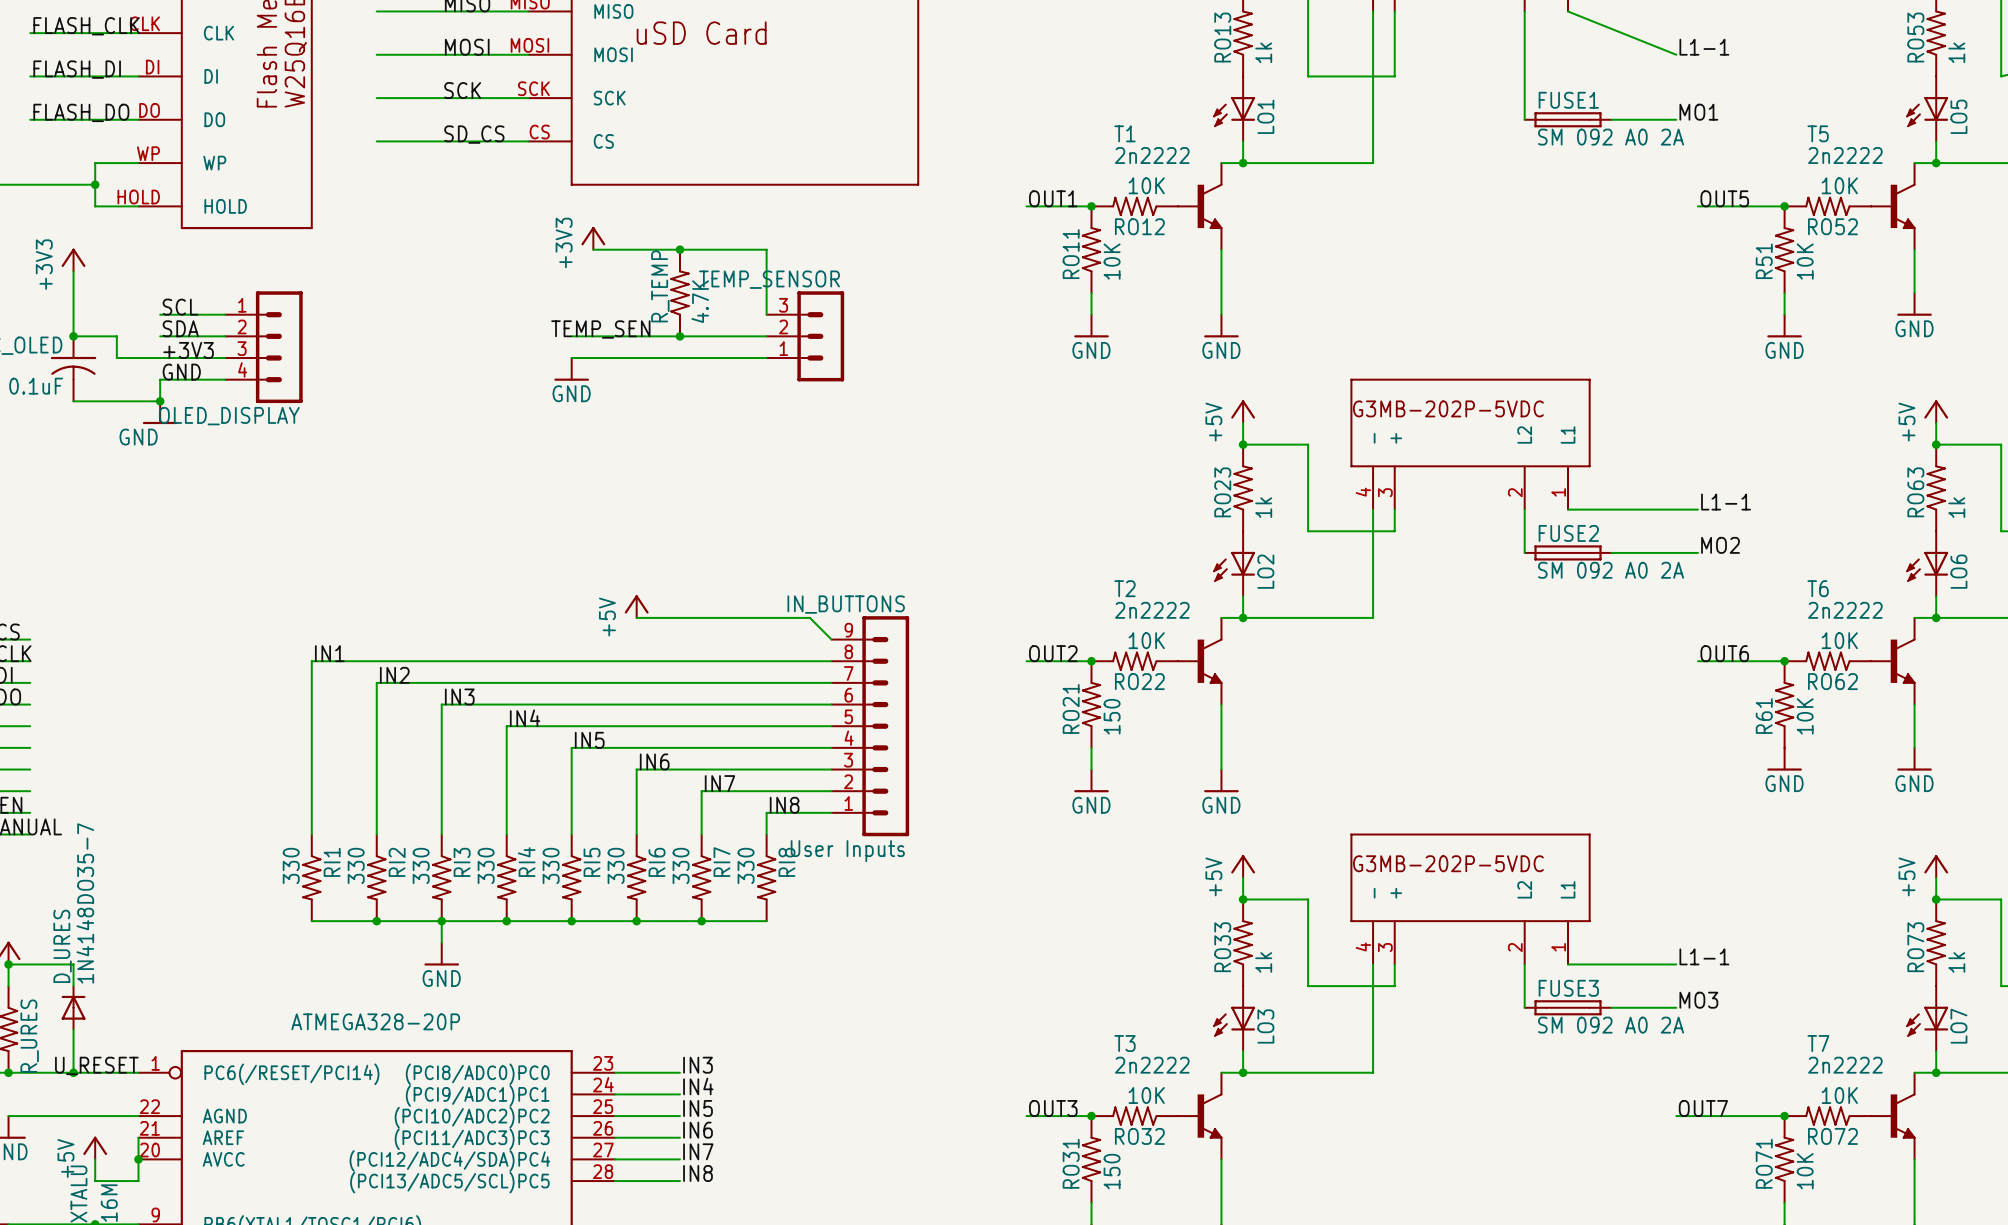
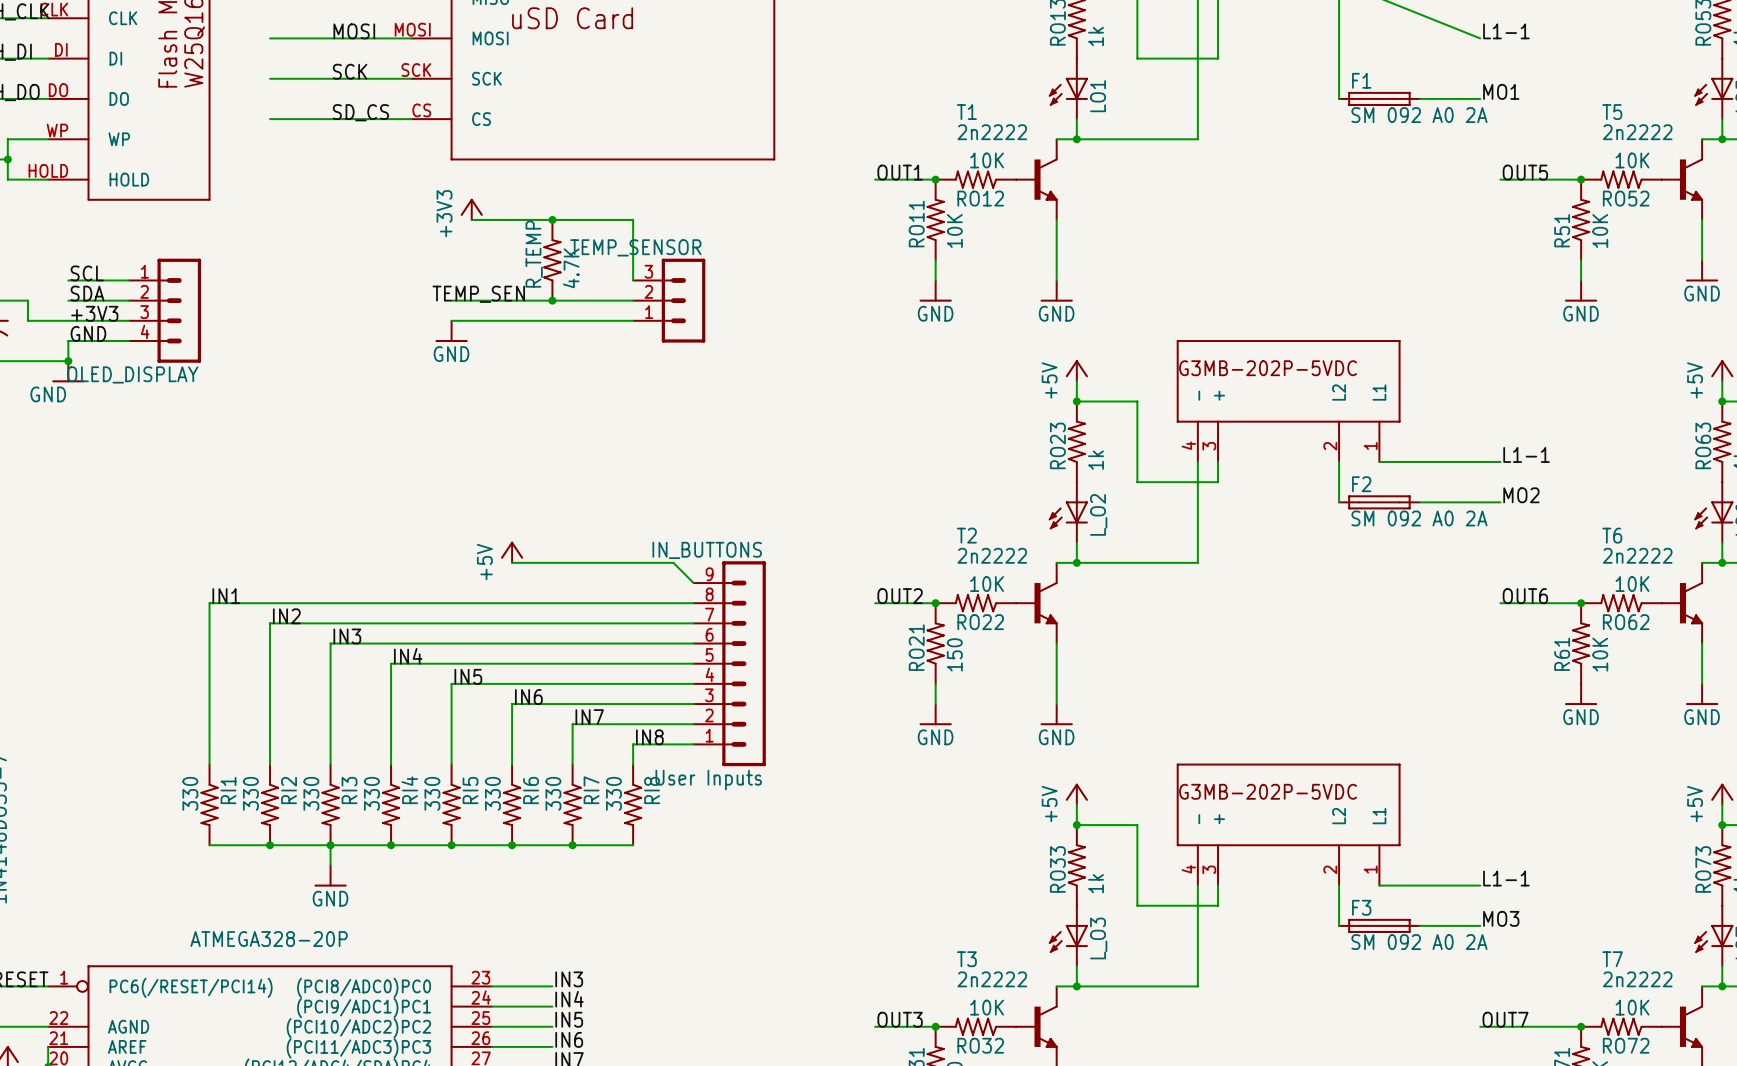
FUSE1 name: FUSE1 (1568, 100) -> F1 (1361, 80)
FUSE2 name: FUSE2 (1568, 533) -> F2 (1361, 484)
LO2 name: LO2 (1265, 571) -> L_O2 (1098, 514)
FUSE3 name: FUSE3 (1568, 988) -> F3 (1361, 907)
LO3 name: LO3 (1265, 1026) -> L_O3 (1098, 938)

